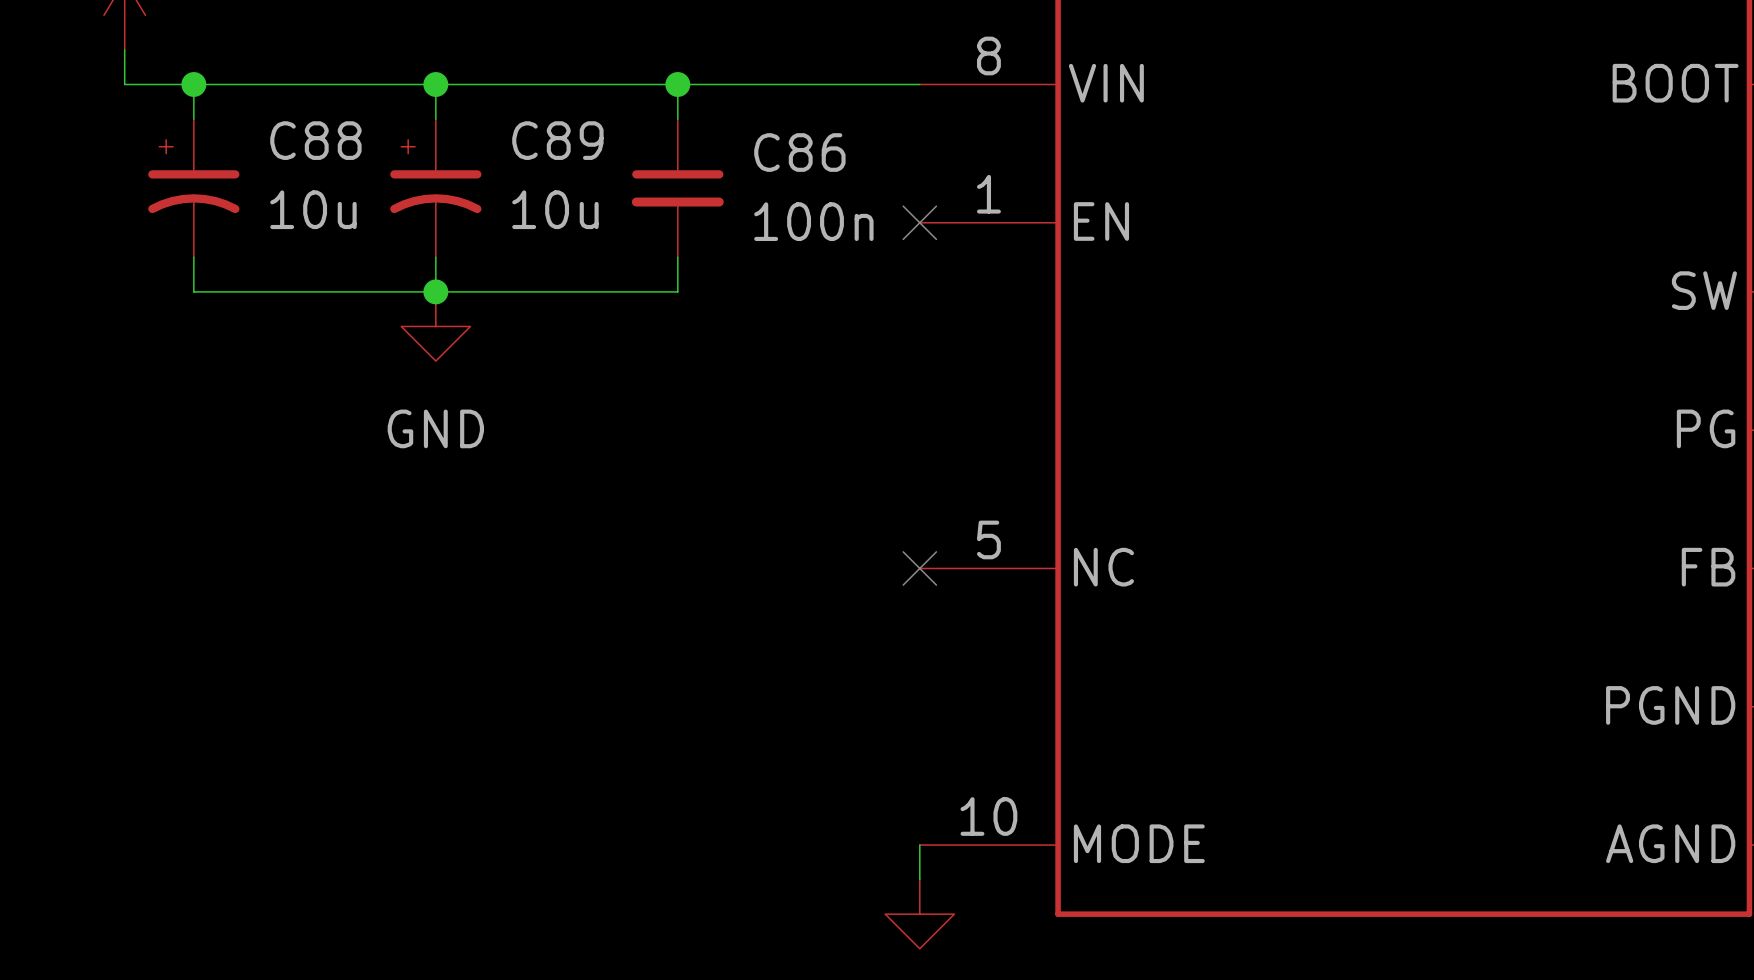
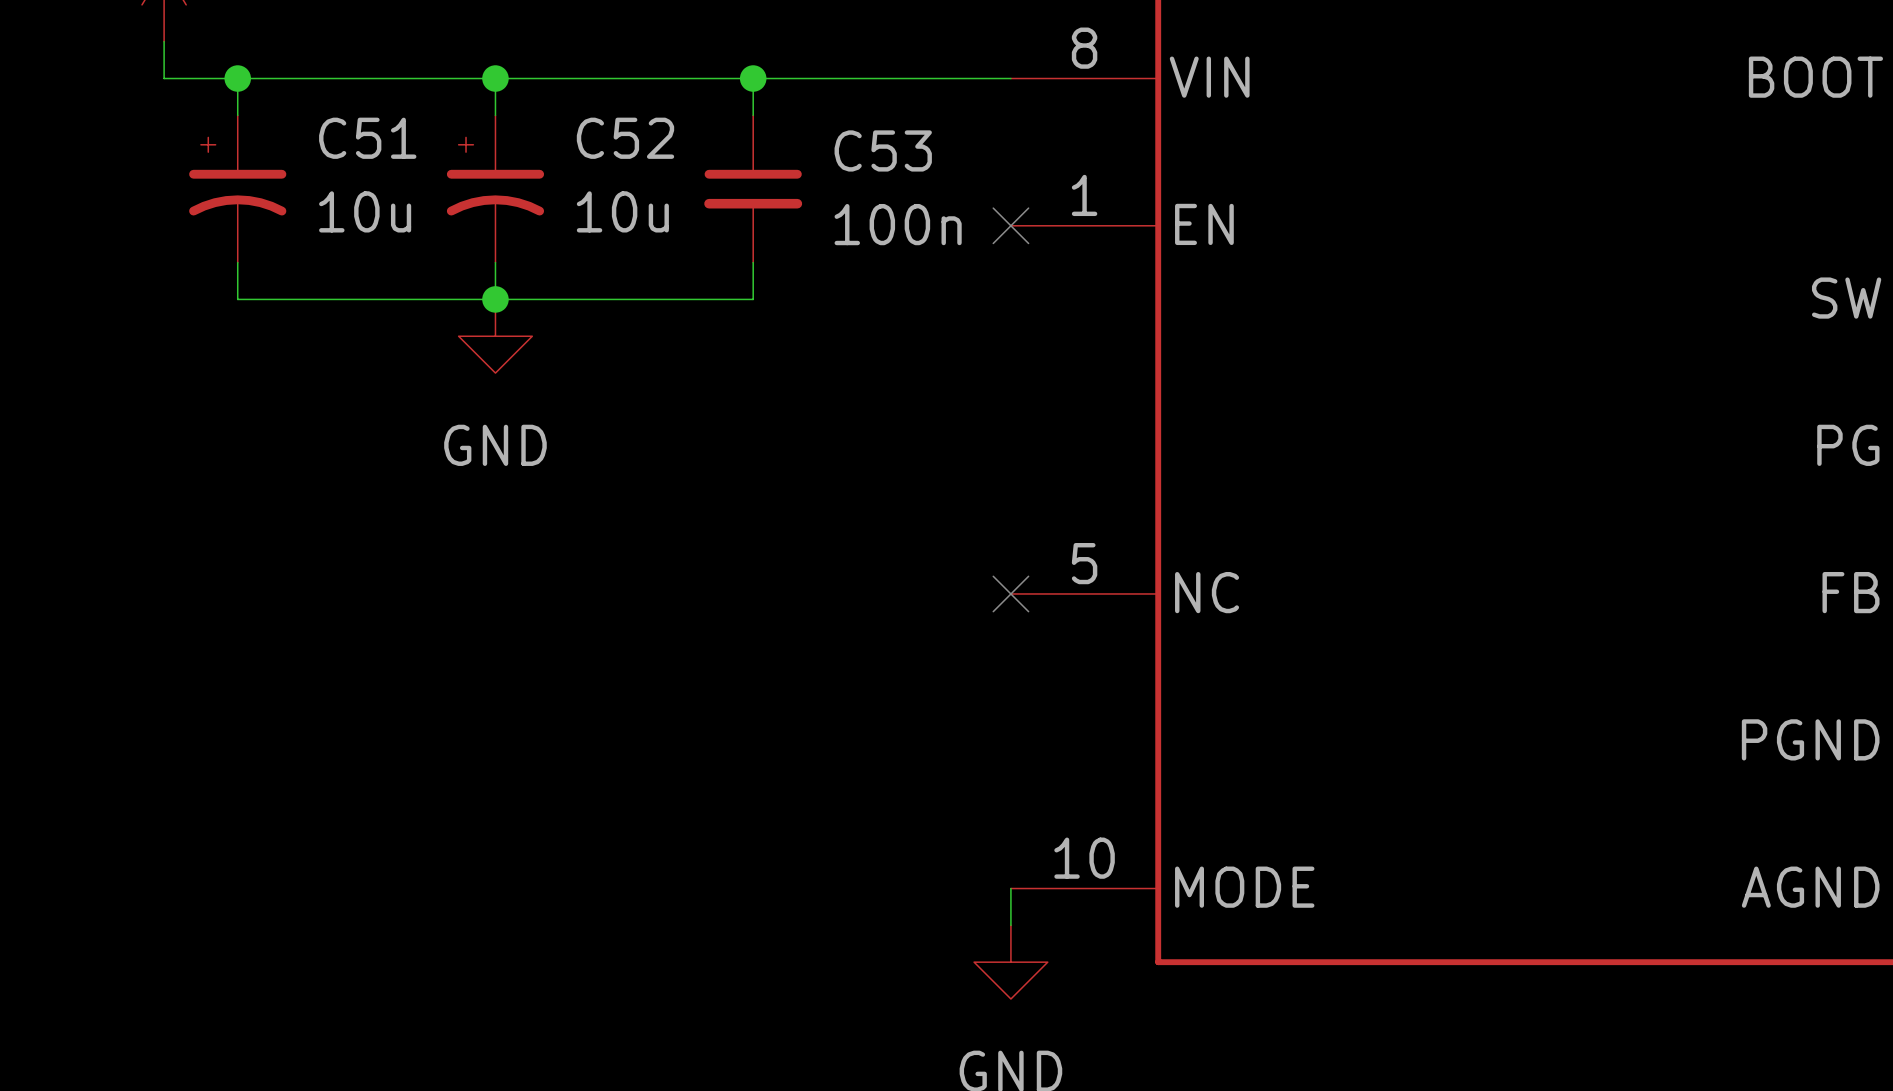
C88 name: C88 (315, 140) -> C51 (367, 138)
C89 name: C89 (557, 140) -> C52 (625, 138)
C86 name: C86 (799, 152) -> C53 (883, 150)

